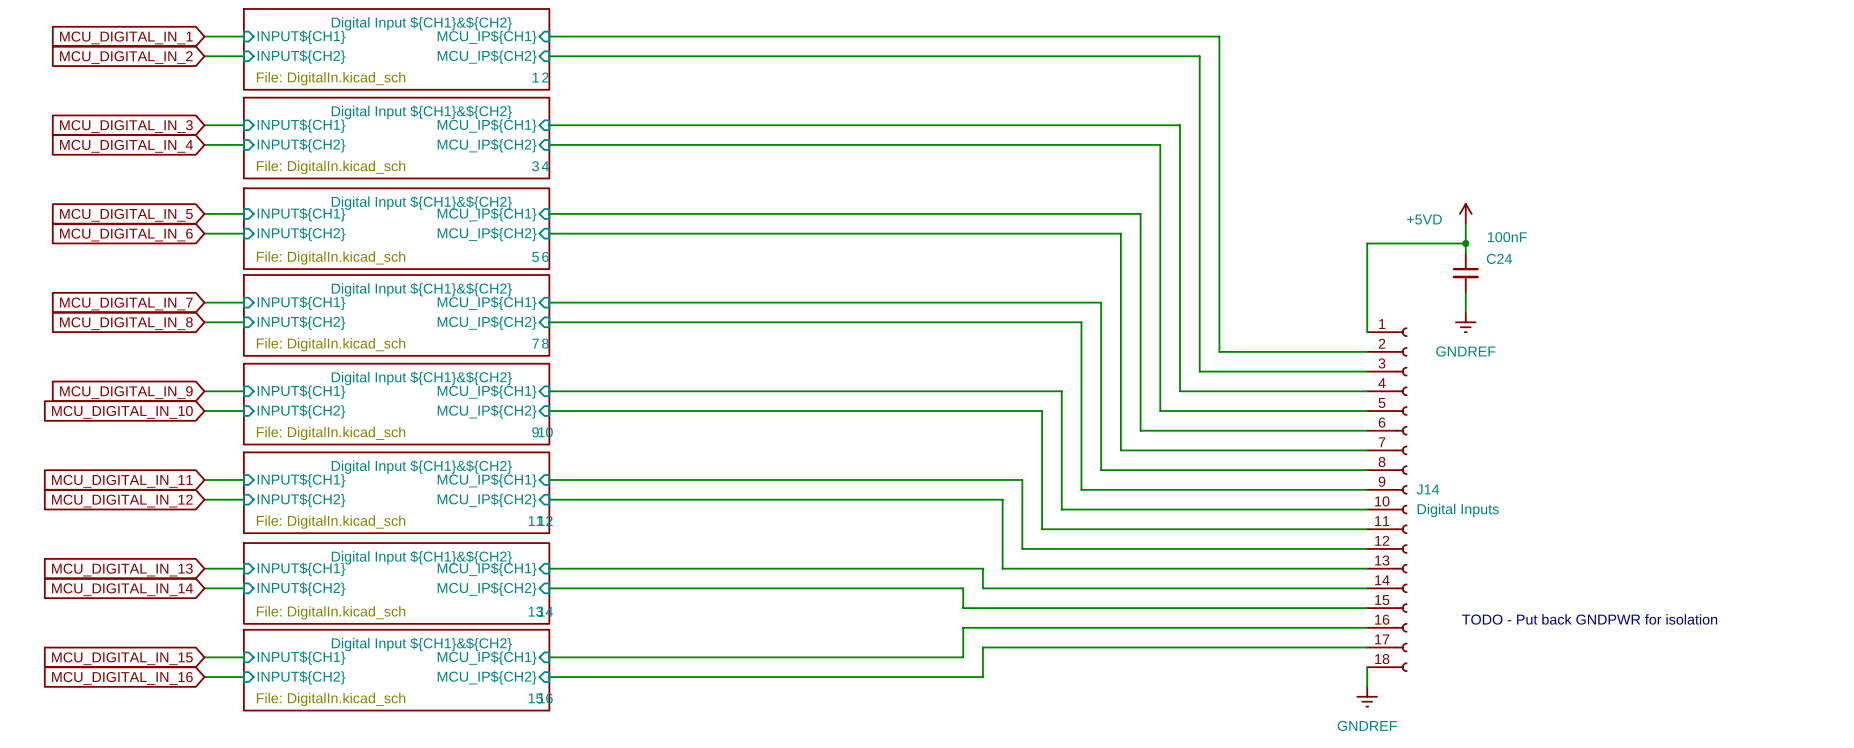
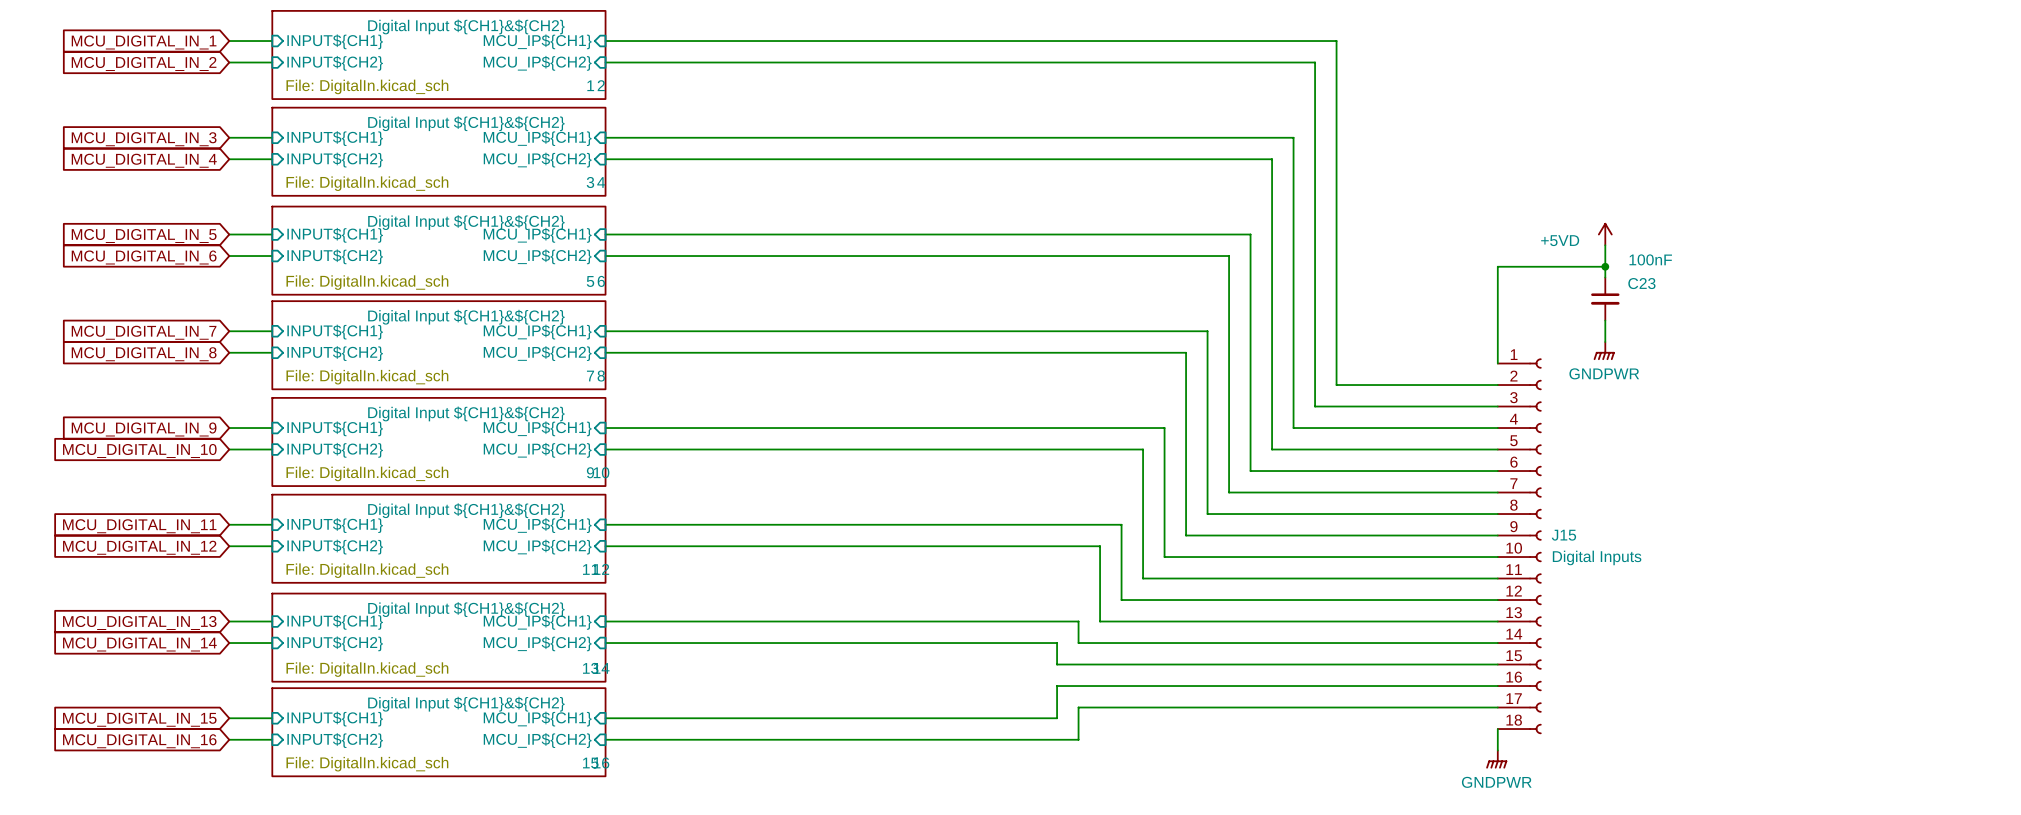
C24 name: C24 (1499, 258) -> C23 (1641, 283)
power symbol: GNDREF (1465, 322) -> GNDPWR (1604, 351)
J14 name: J14 (1427, 489) -> J15 (1563, 535)
text: TODO - Put back GNDPWR for isolation (1589, 619) -> none
power symbol: GNDREF (1367, 696) -> GNDPWR (1496, 759)

